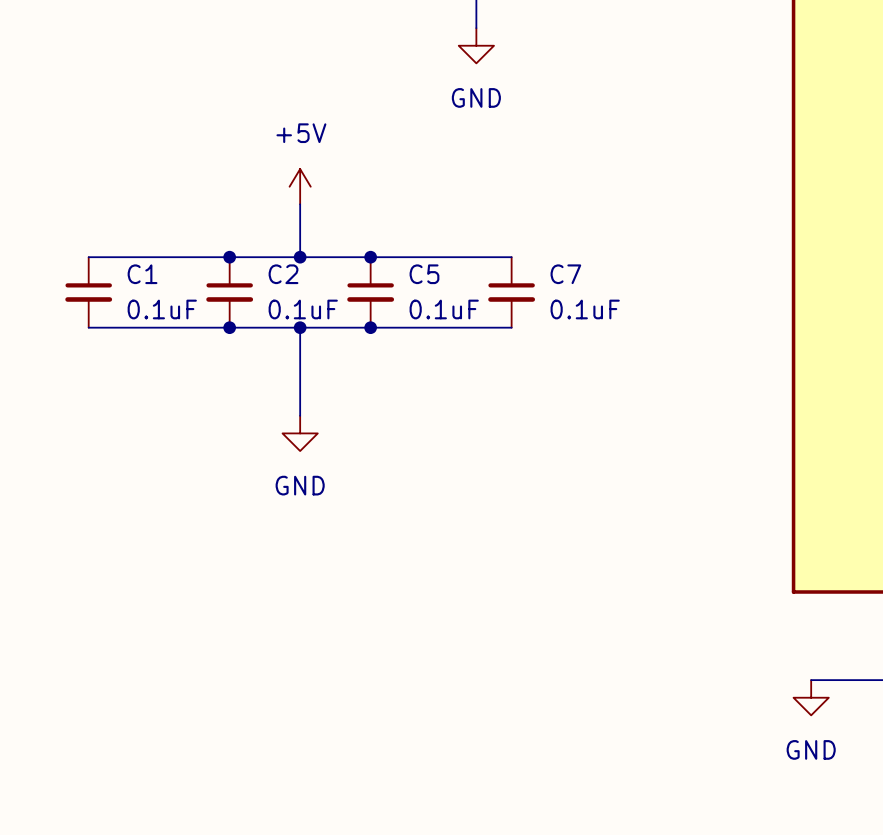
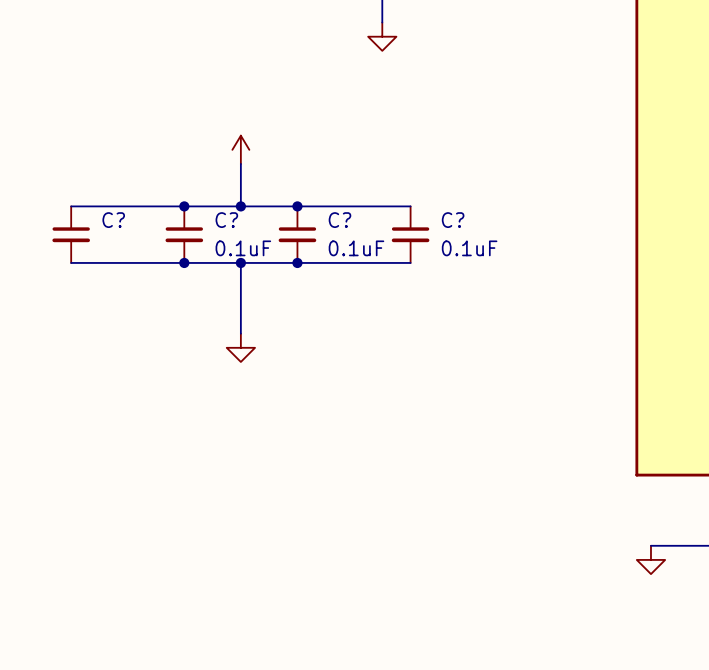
power symbol text: GND (476, 97) -> none
power symbol text: +5V (301, 133) -> none
C1 name: C1 (142, 274) -> C? (113, 220)
C2 name: C2 (283, 274) -> C? (226, 220)
C5 name: C5 (424, 274) -> C? (339, 220)
C7 name: C7 (565, 274) -> C? (453, 220)
C1 value: 0.1uF (162, 309) -> none
power symbol text: GND (300, 485) -> none
power symbol text: GND (811, 749) -> none

